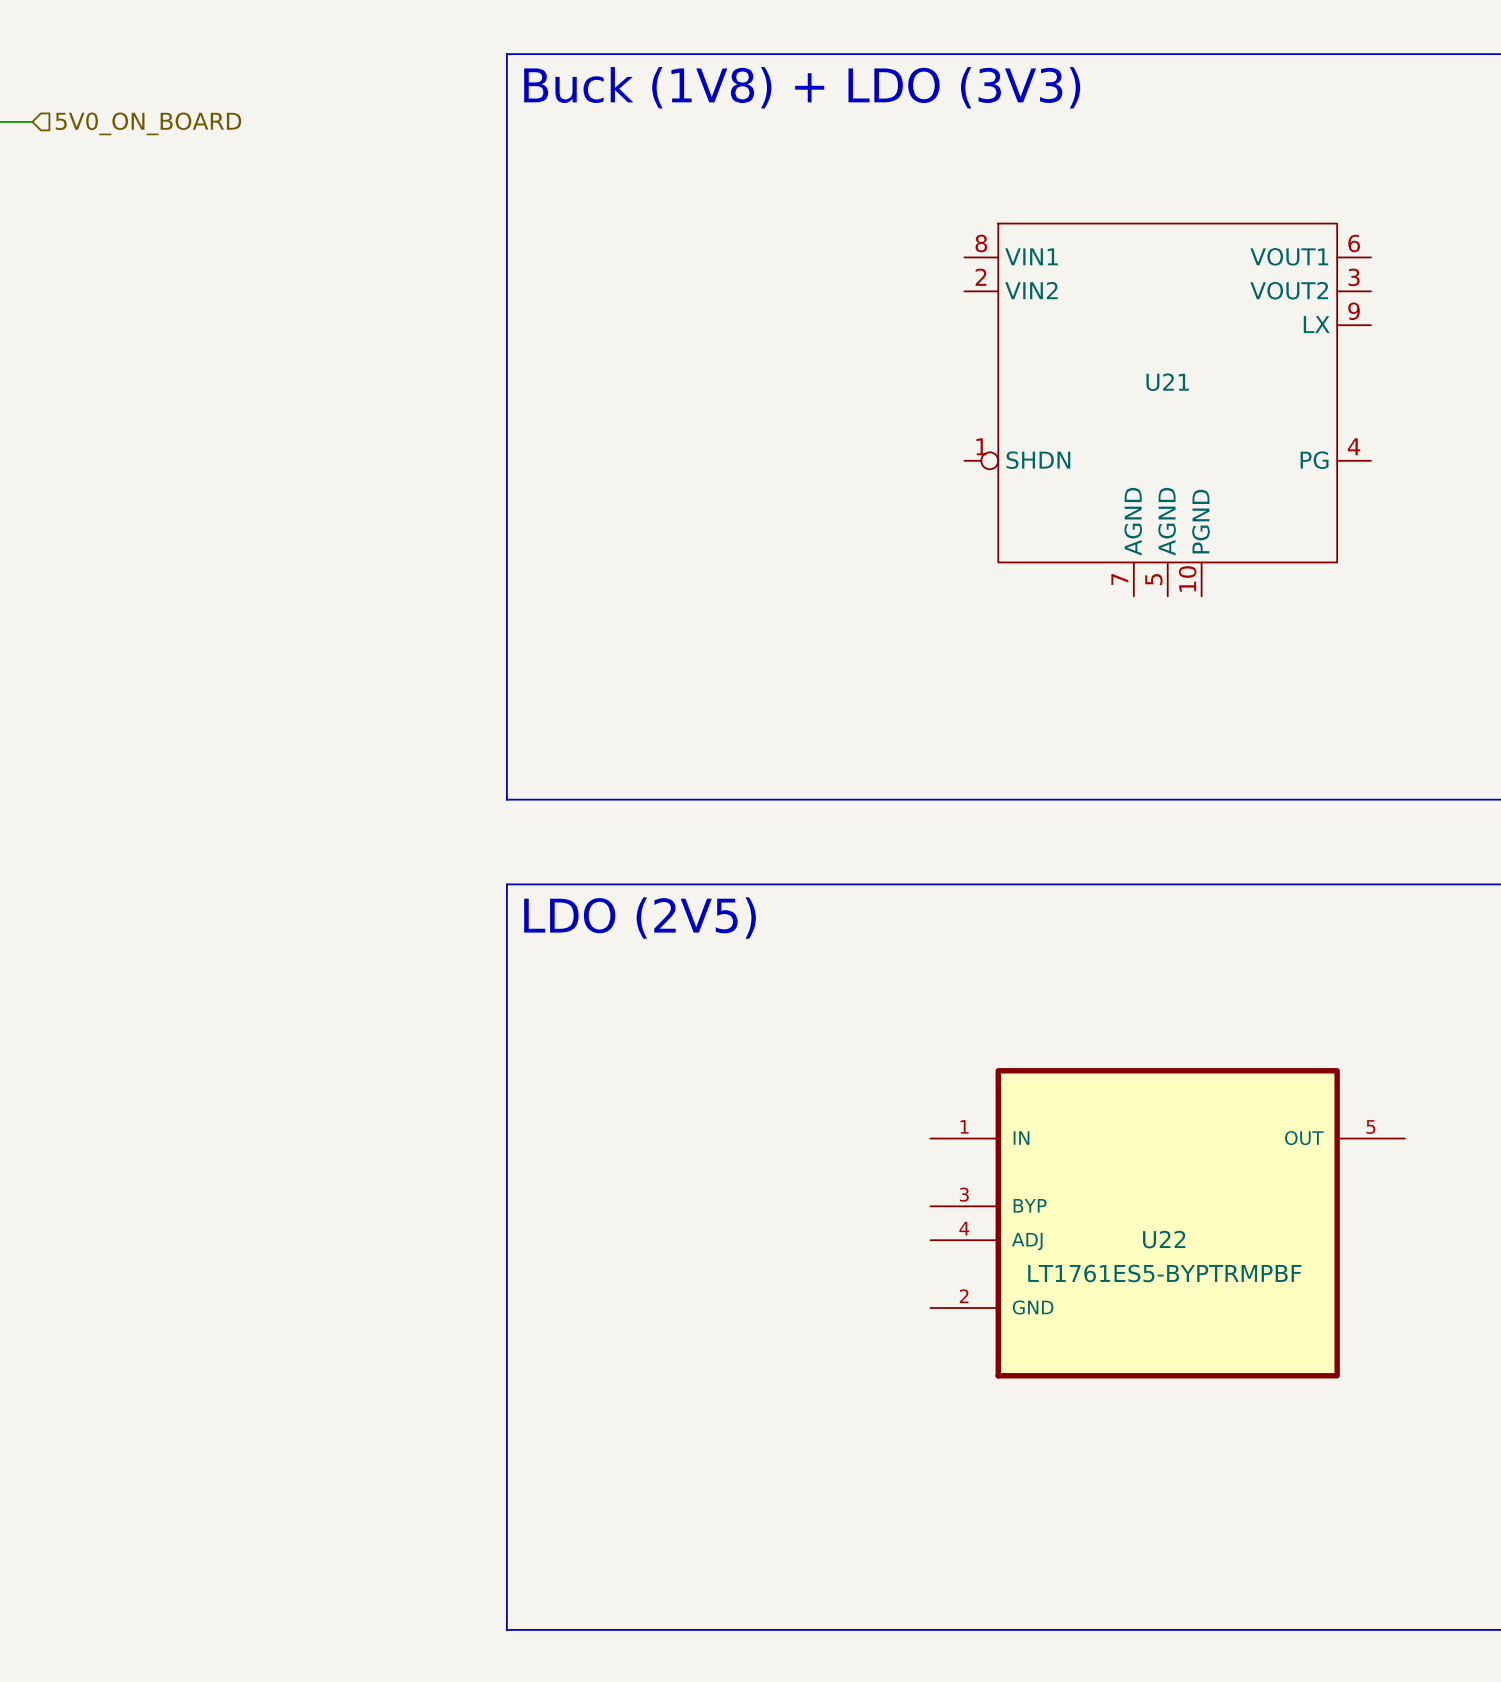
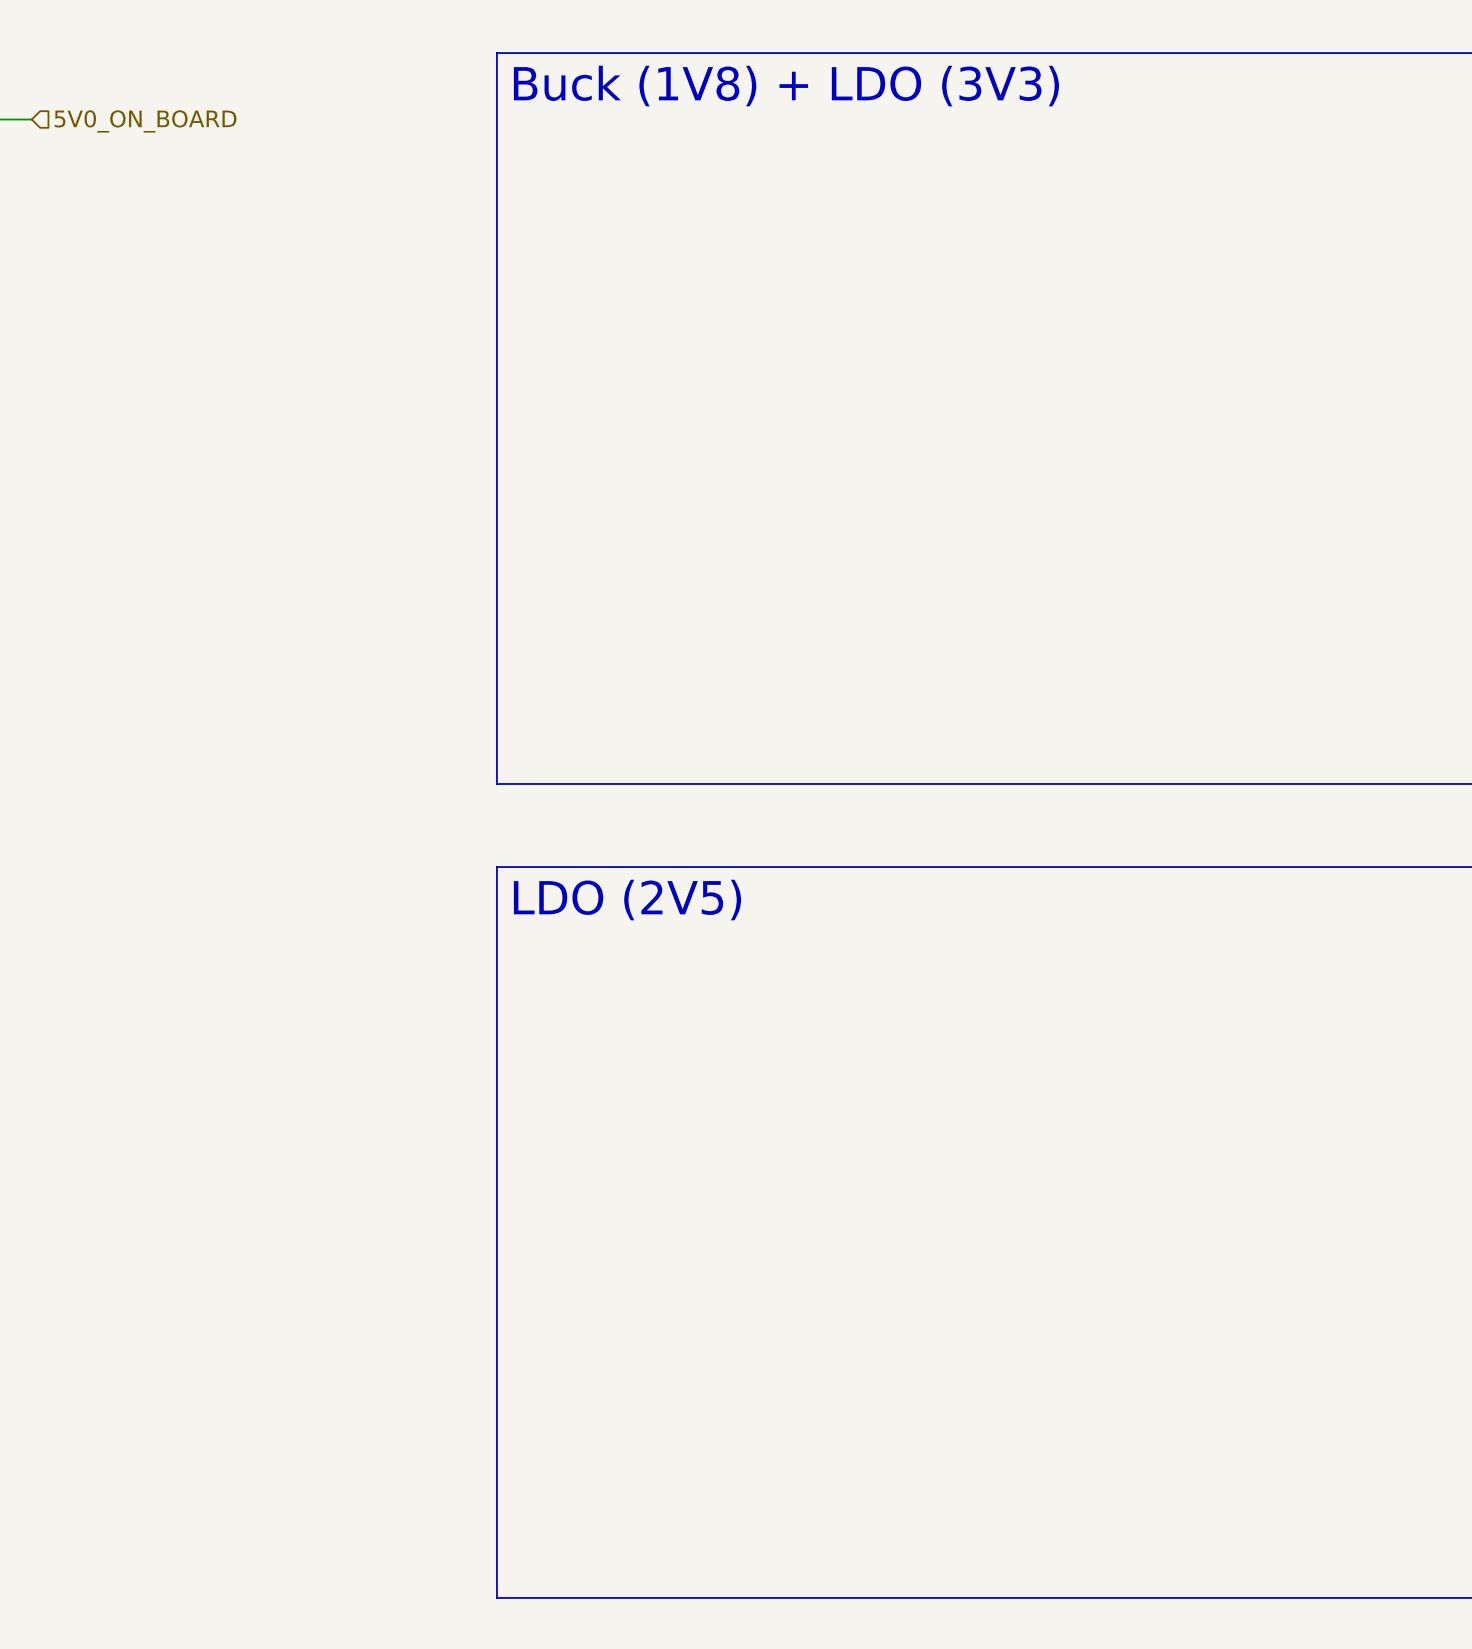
U21: (1167, 409) -> none
U22: LT1761ES5-BYPTRMPBF (1167, 1223) -> none

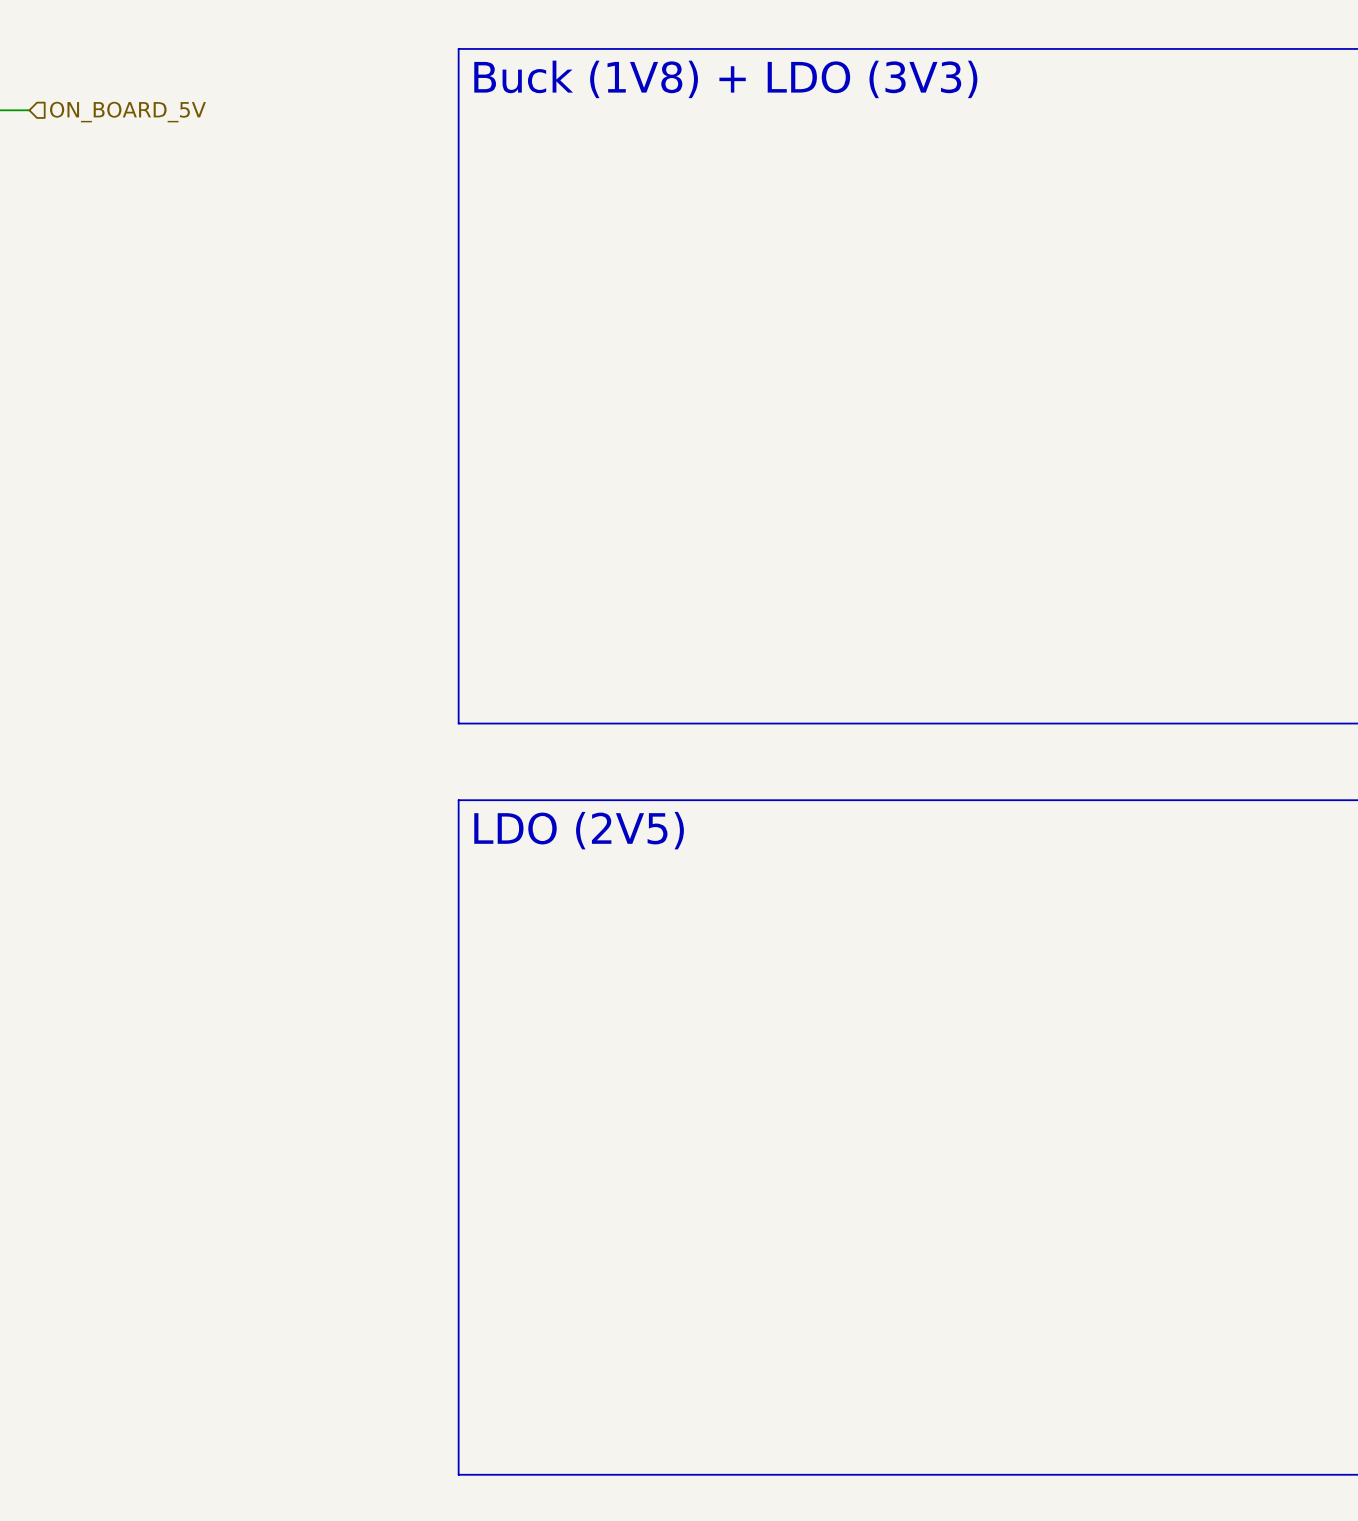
hierarchical label: 5V0_ON_BOARD (145, 121) -> ON_BOARD_5V (127, 112)

